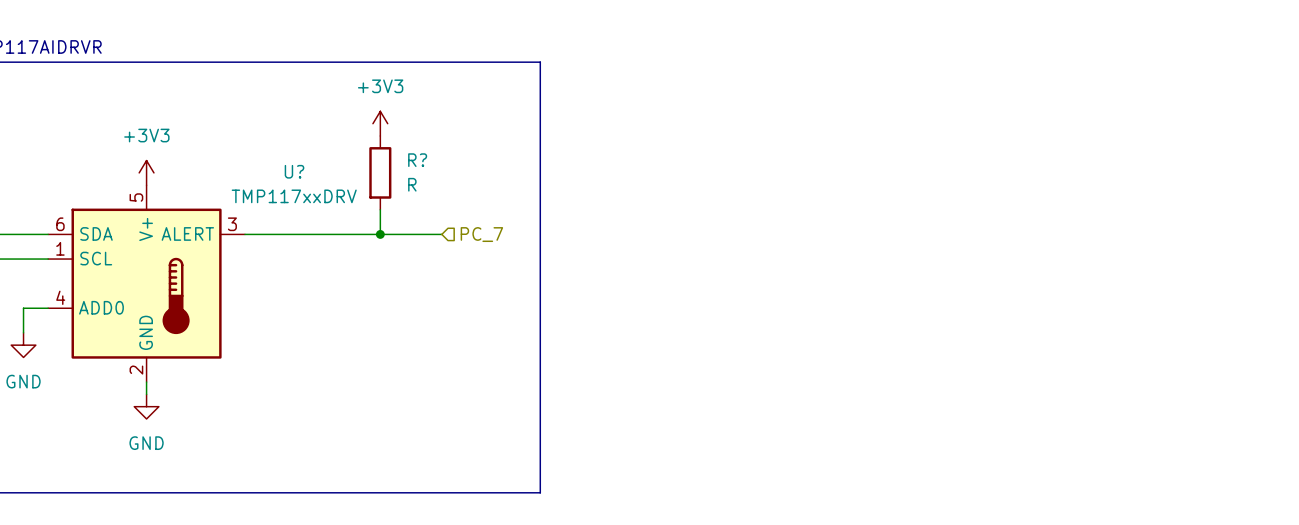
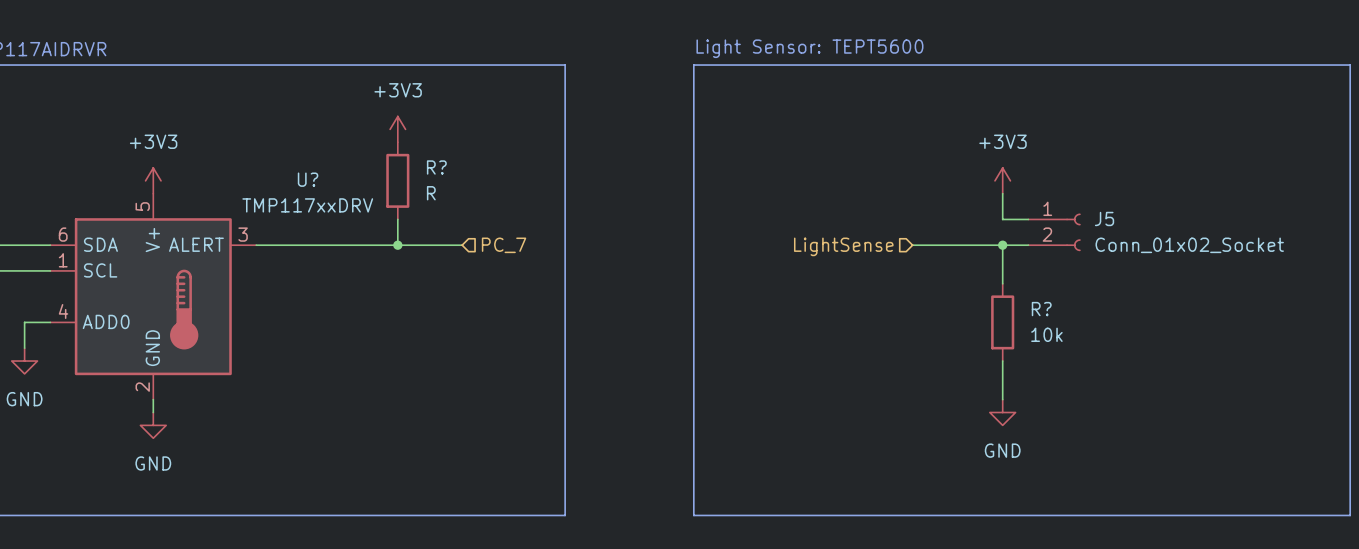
text: none -> Light Sensor: TEPT5600 (809, 48)
line: none -> (693, 65) (1350, 65) (1350, 515) (693, 515) (693, 65)
power symbol: none -> +3V3 (1002, 180)
wire: none -> (1002, 193) (1002, 219) (1028, 219)
J5: none -> Conn_01x02_Socket (1054, 232)
wire: none -> (912, 245) (1028, 245)
wire: none -> (1002, 245) (1002, 283)
junction: none -> (1002, 245)
hierarchical label: none -> LightSense (843, 246)
R?: none -> 10k (1002, 322)
wire: none -> (1002, 361) (1002, 399)
power symbol: none -> GND (1002, 412)

